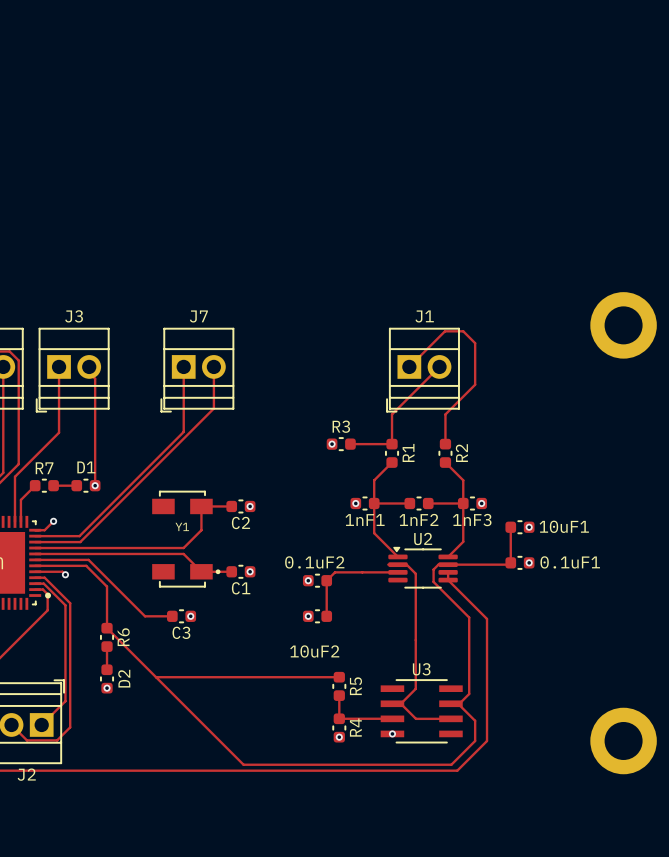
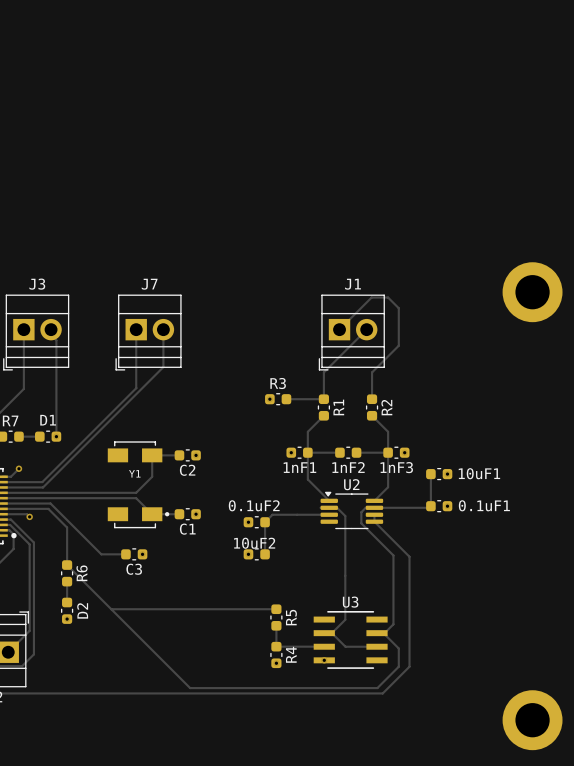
10uF2 name position: 10uF2 (314, 651) -> 10uF2 (254, 543)
part position: (623, 740) -> (532, 720)

